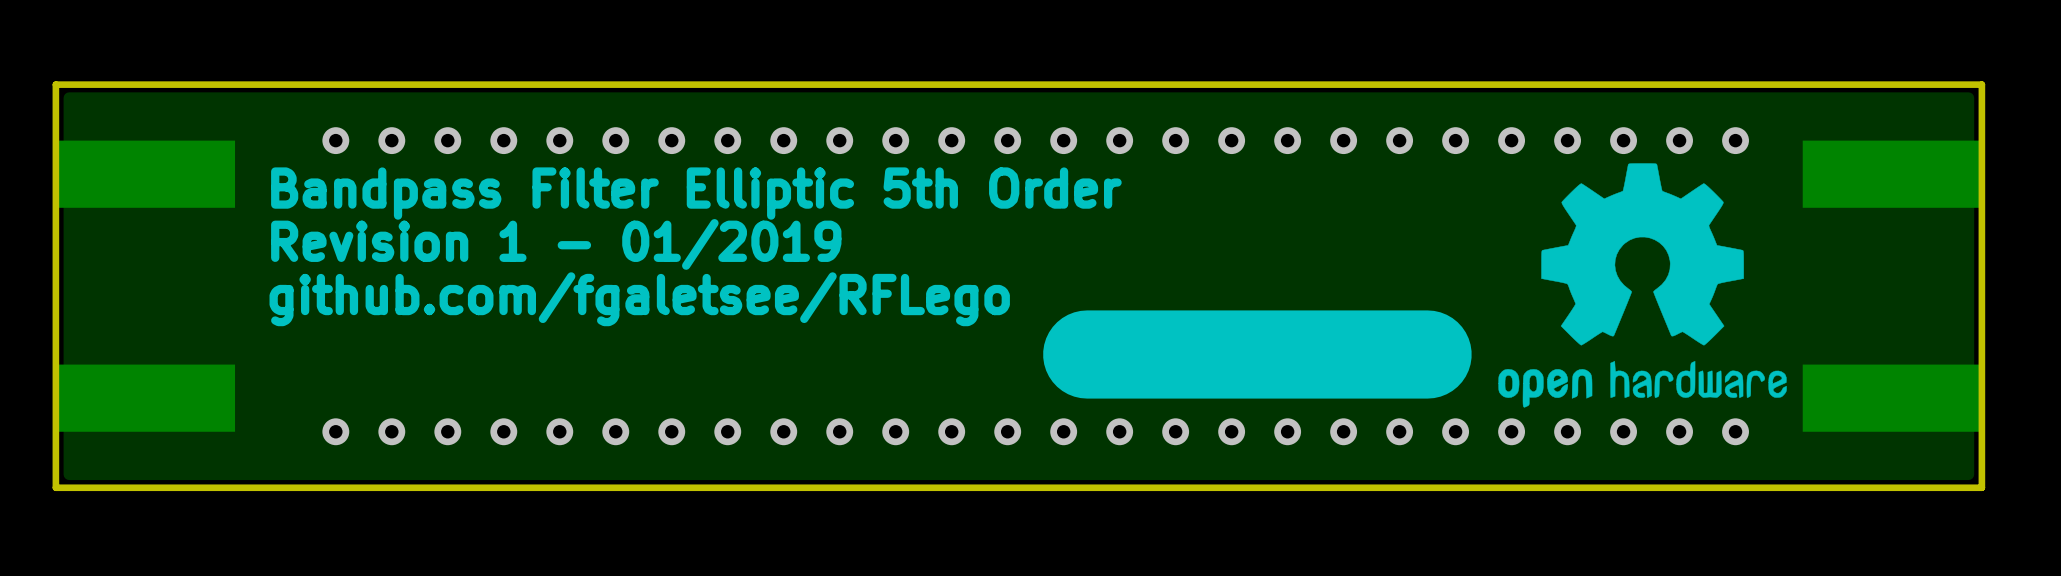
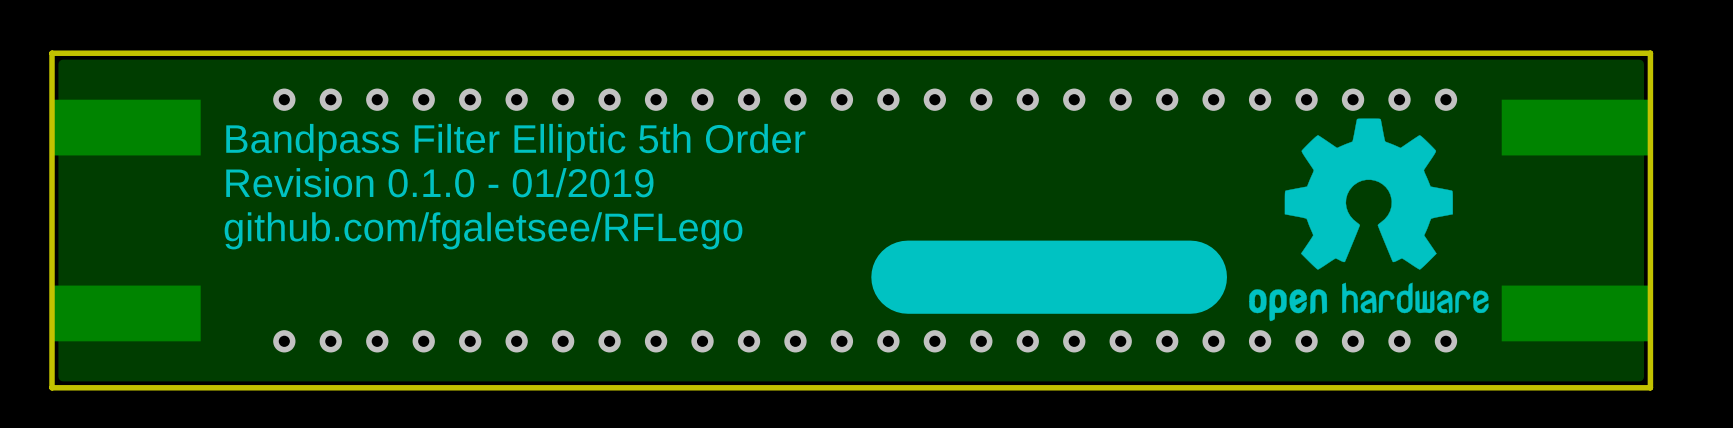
text: Revision 1 - 01/2019 (556, 244) -> Revision 0.1.0 - 01/2019 (439, 182)

